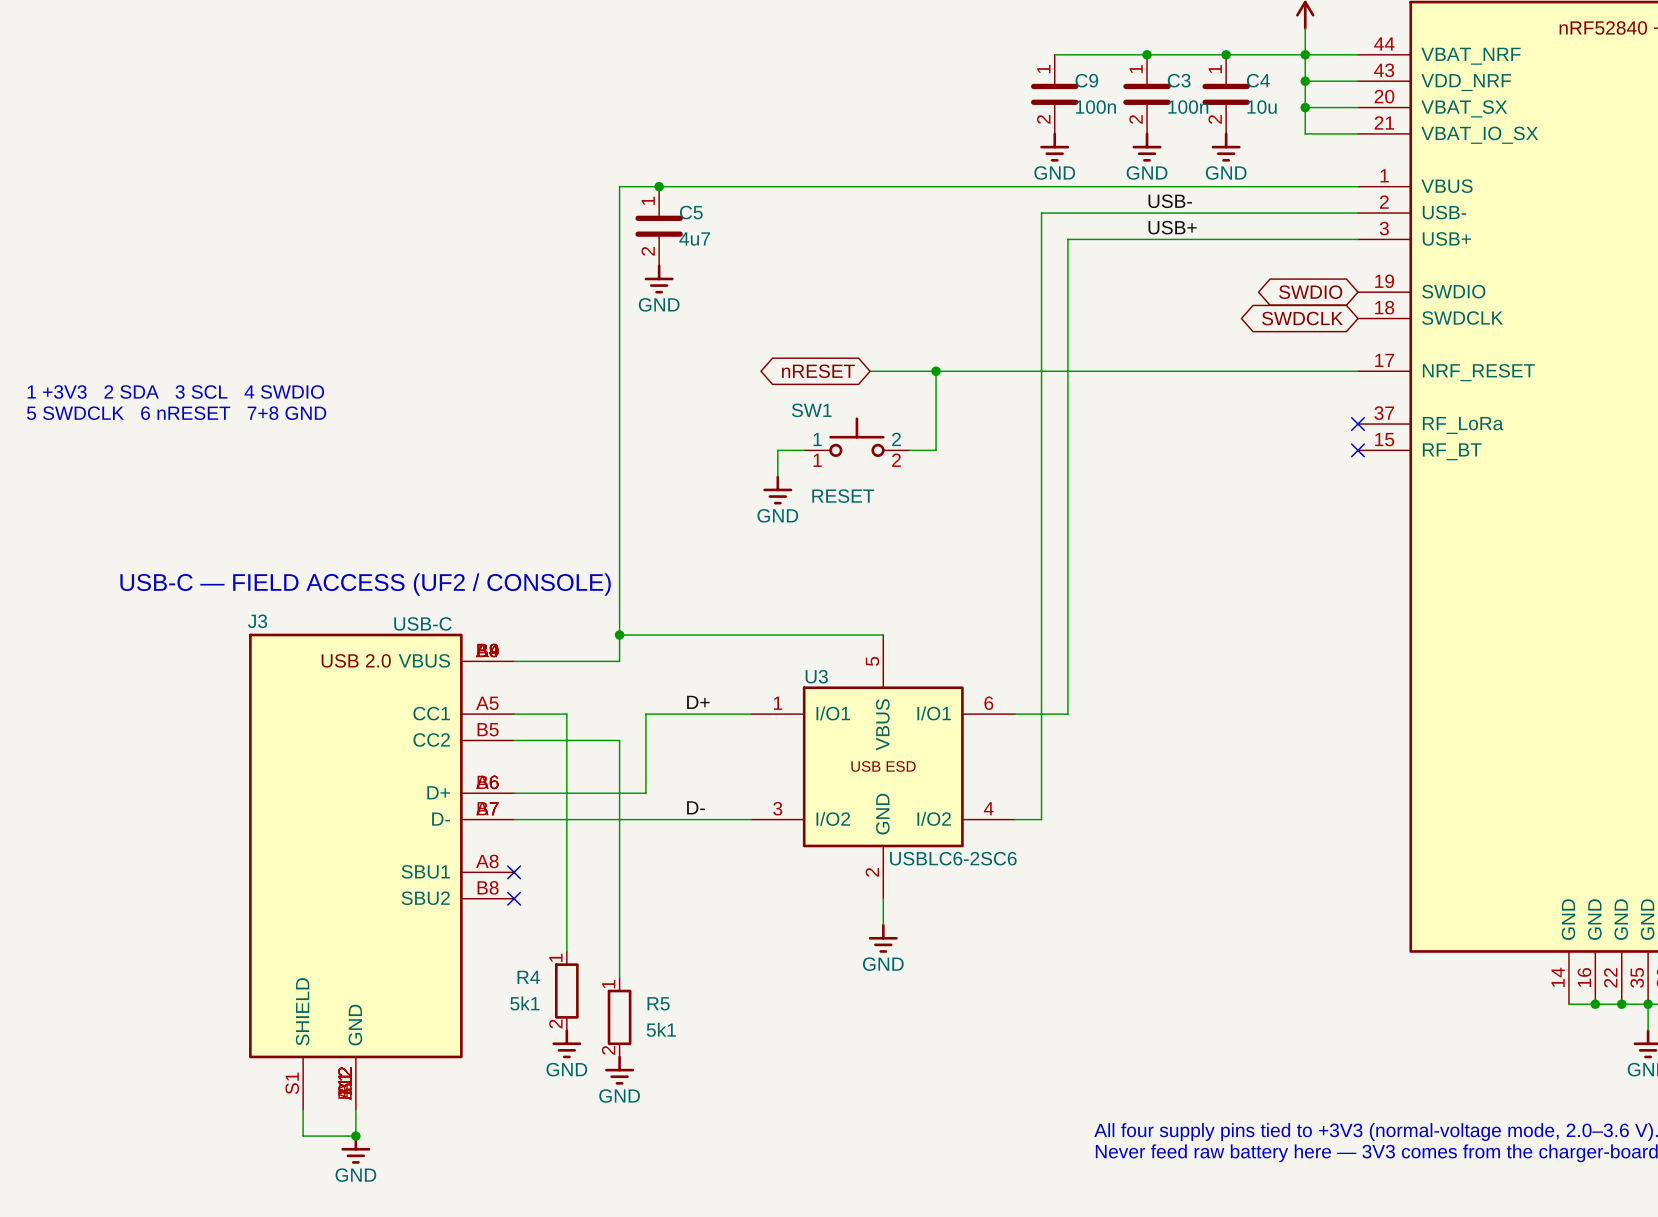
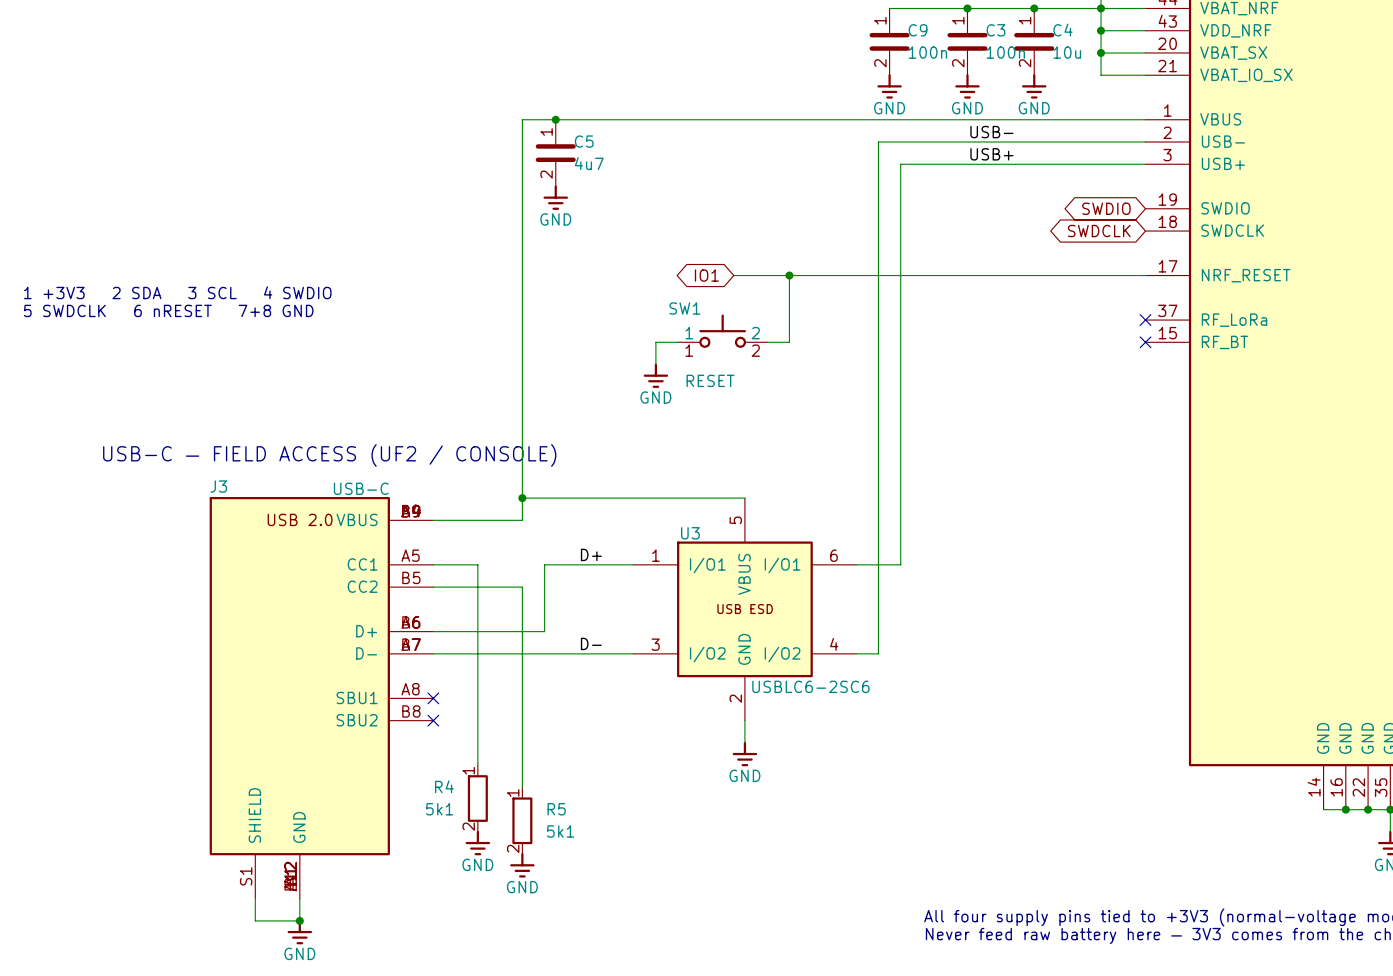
global label: nRESET (818, 371) -> IO1 (706, 275)

